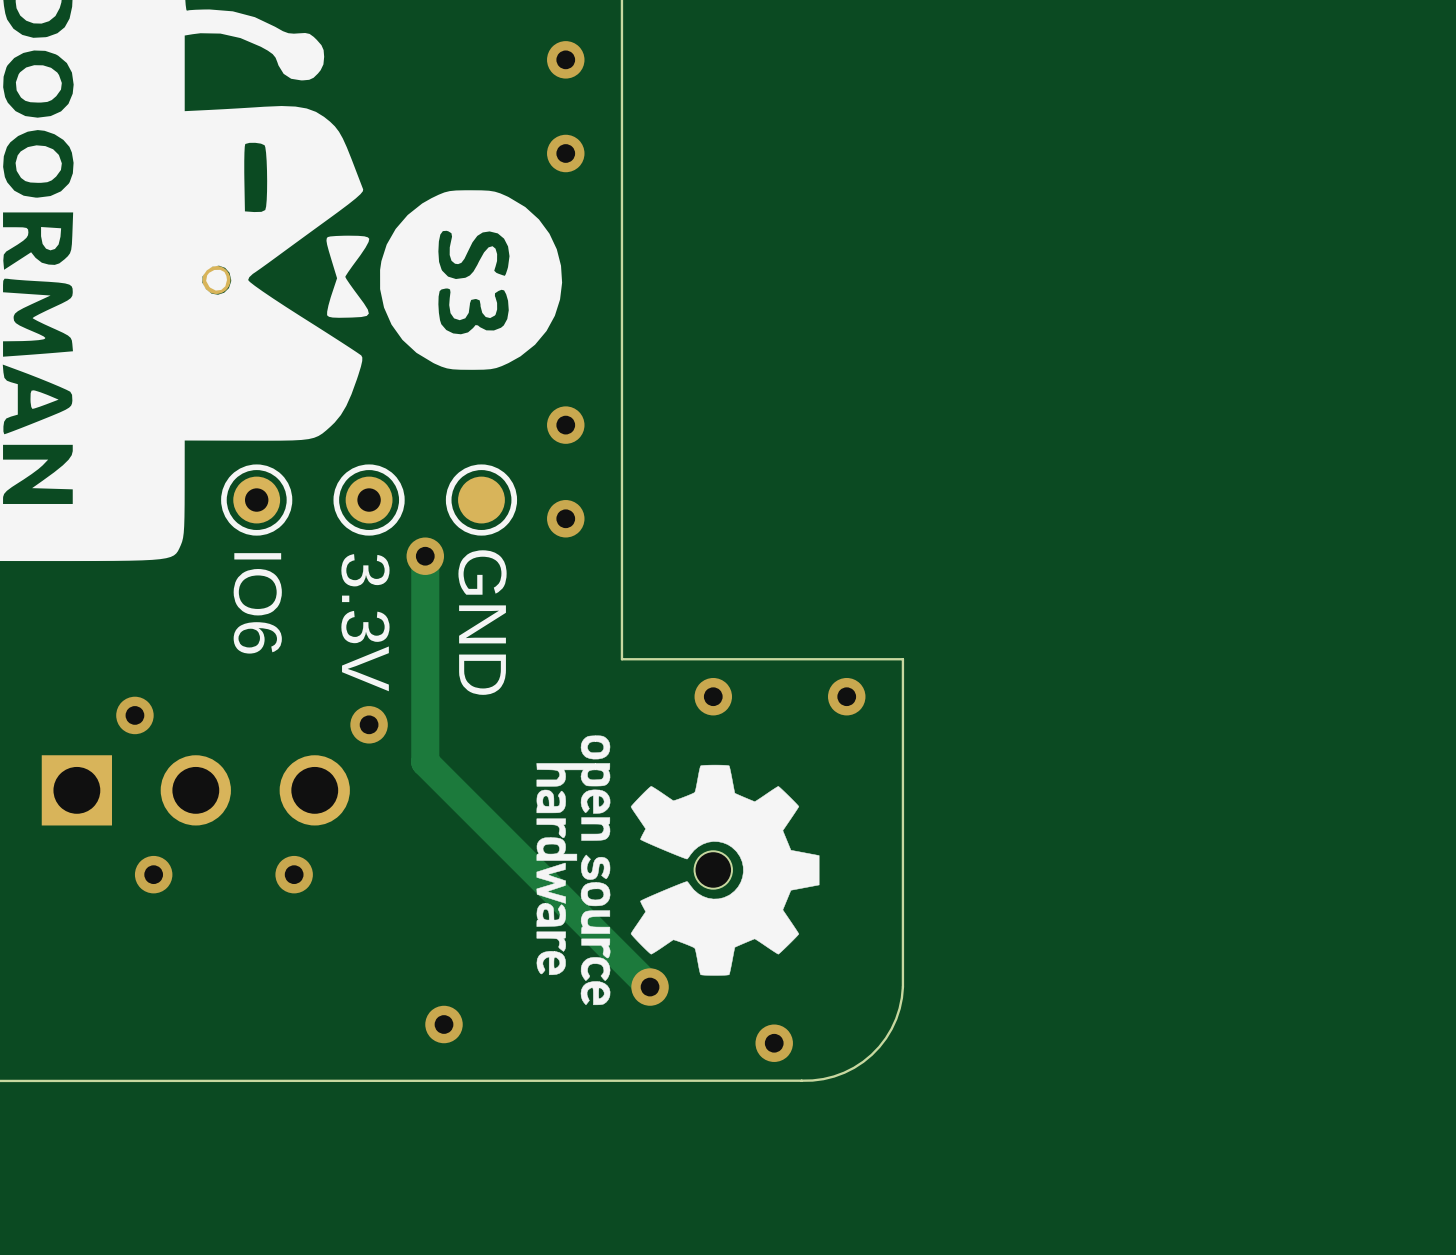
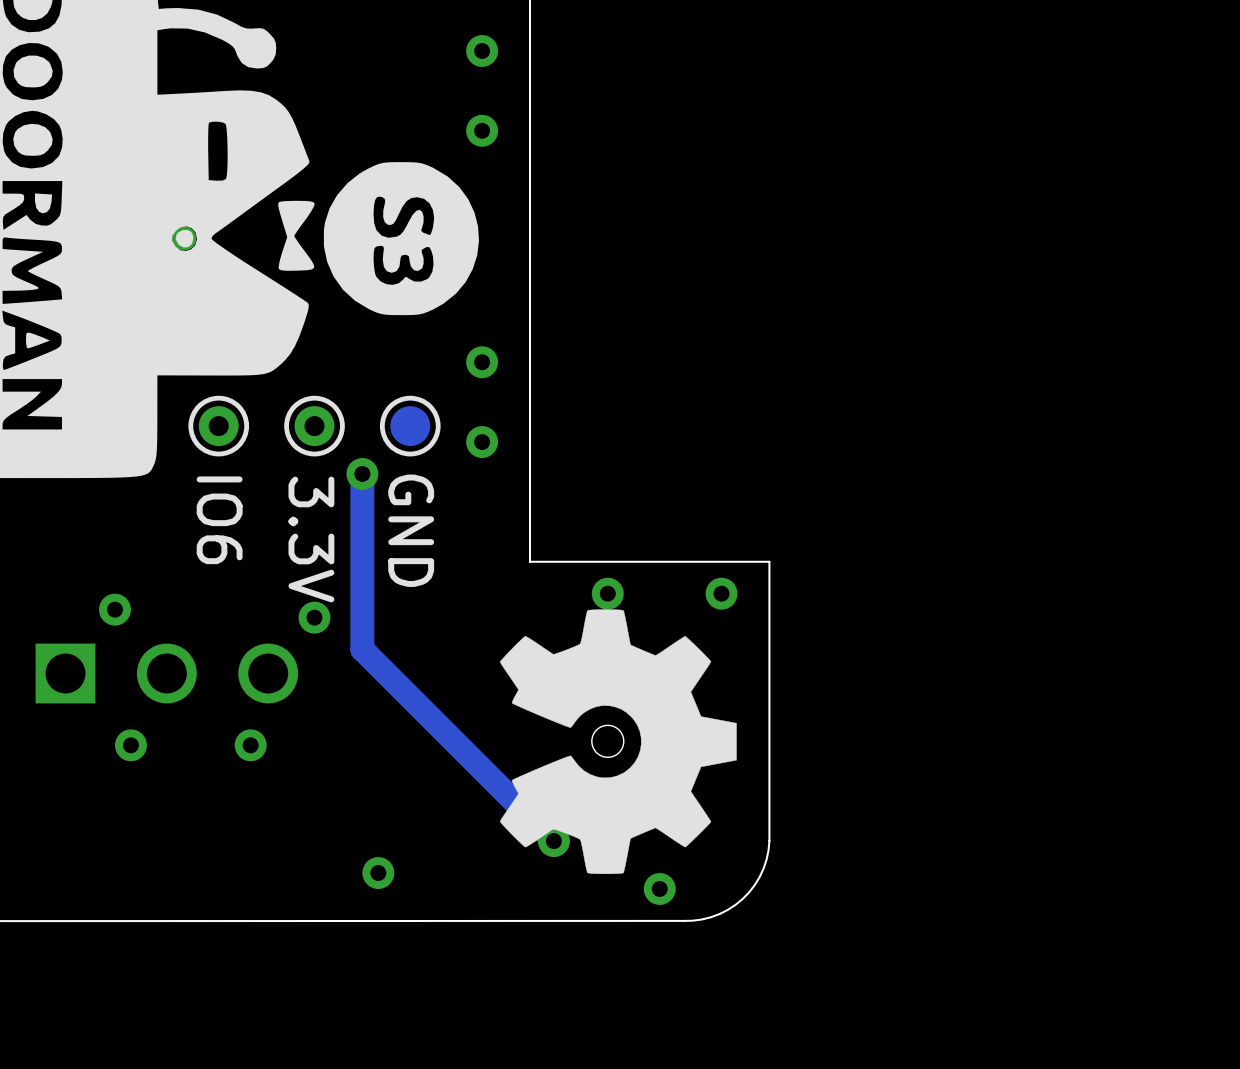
drawing: none -> [499, 609, 737, 875]
drawing: [536, 735, 820, 1006] -> none

